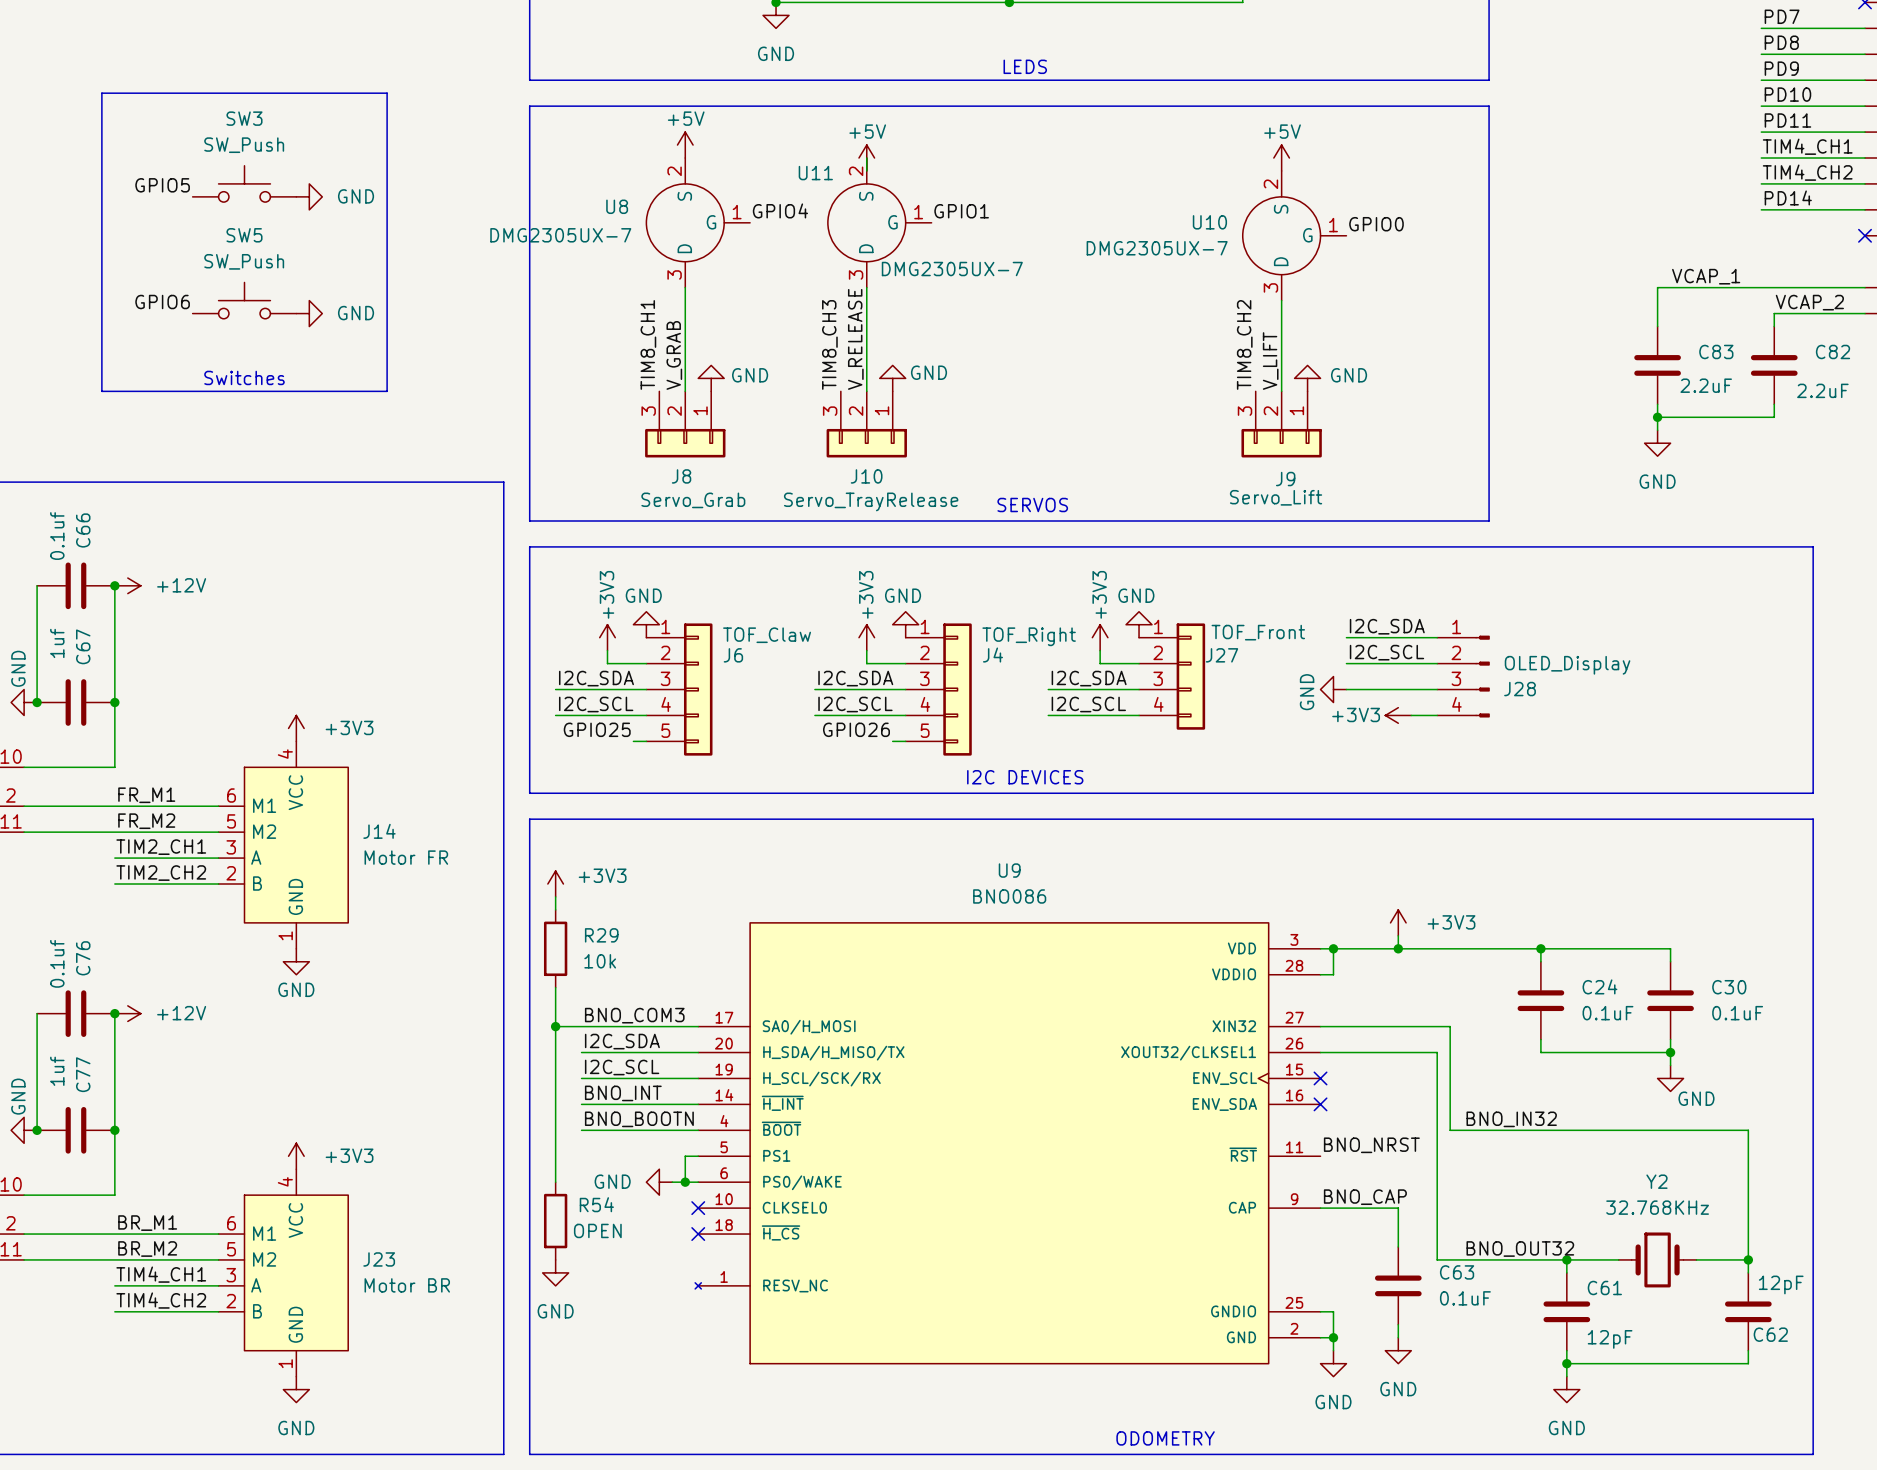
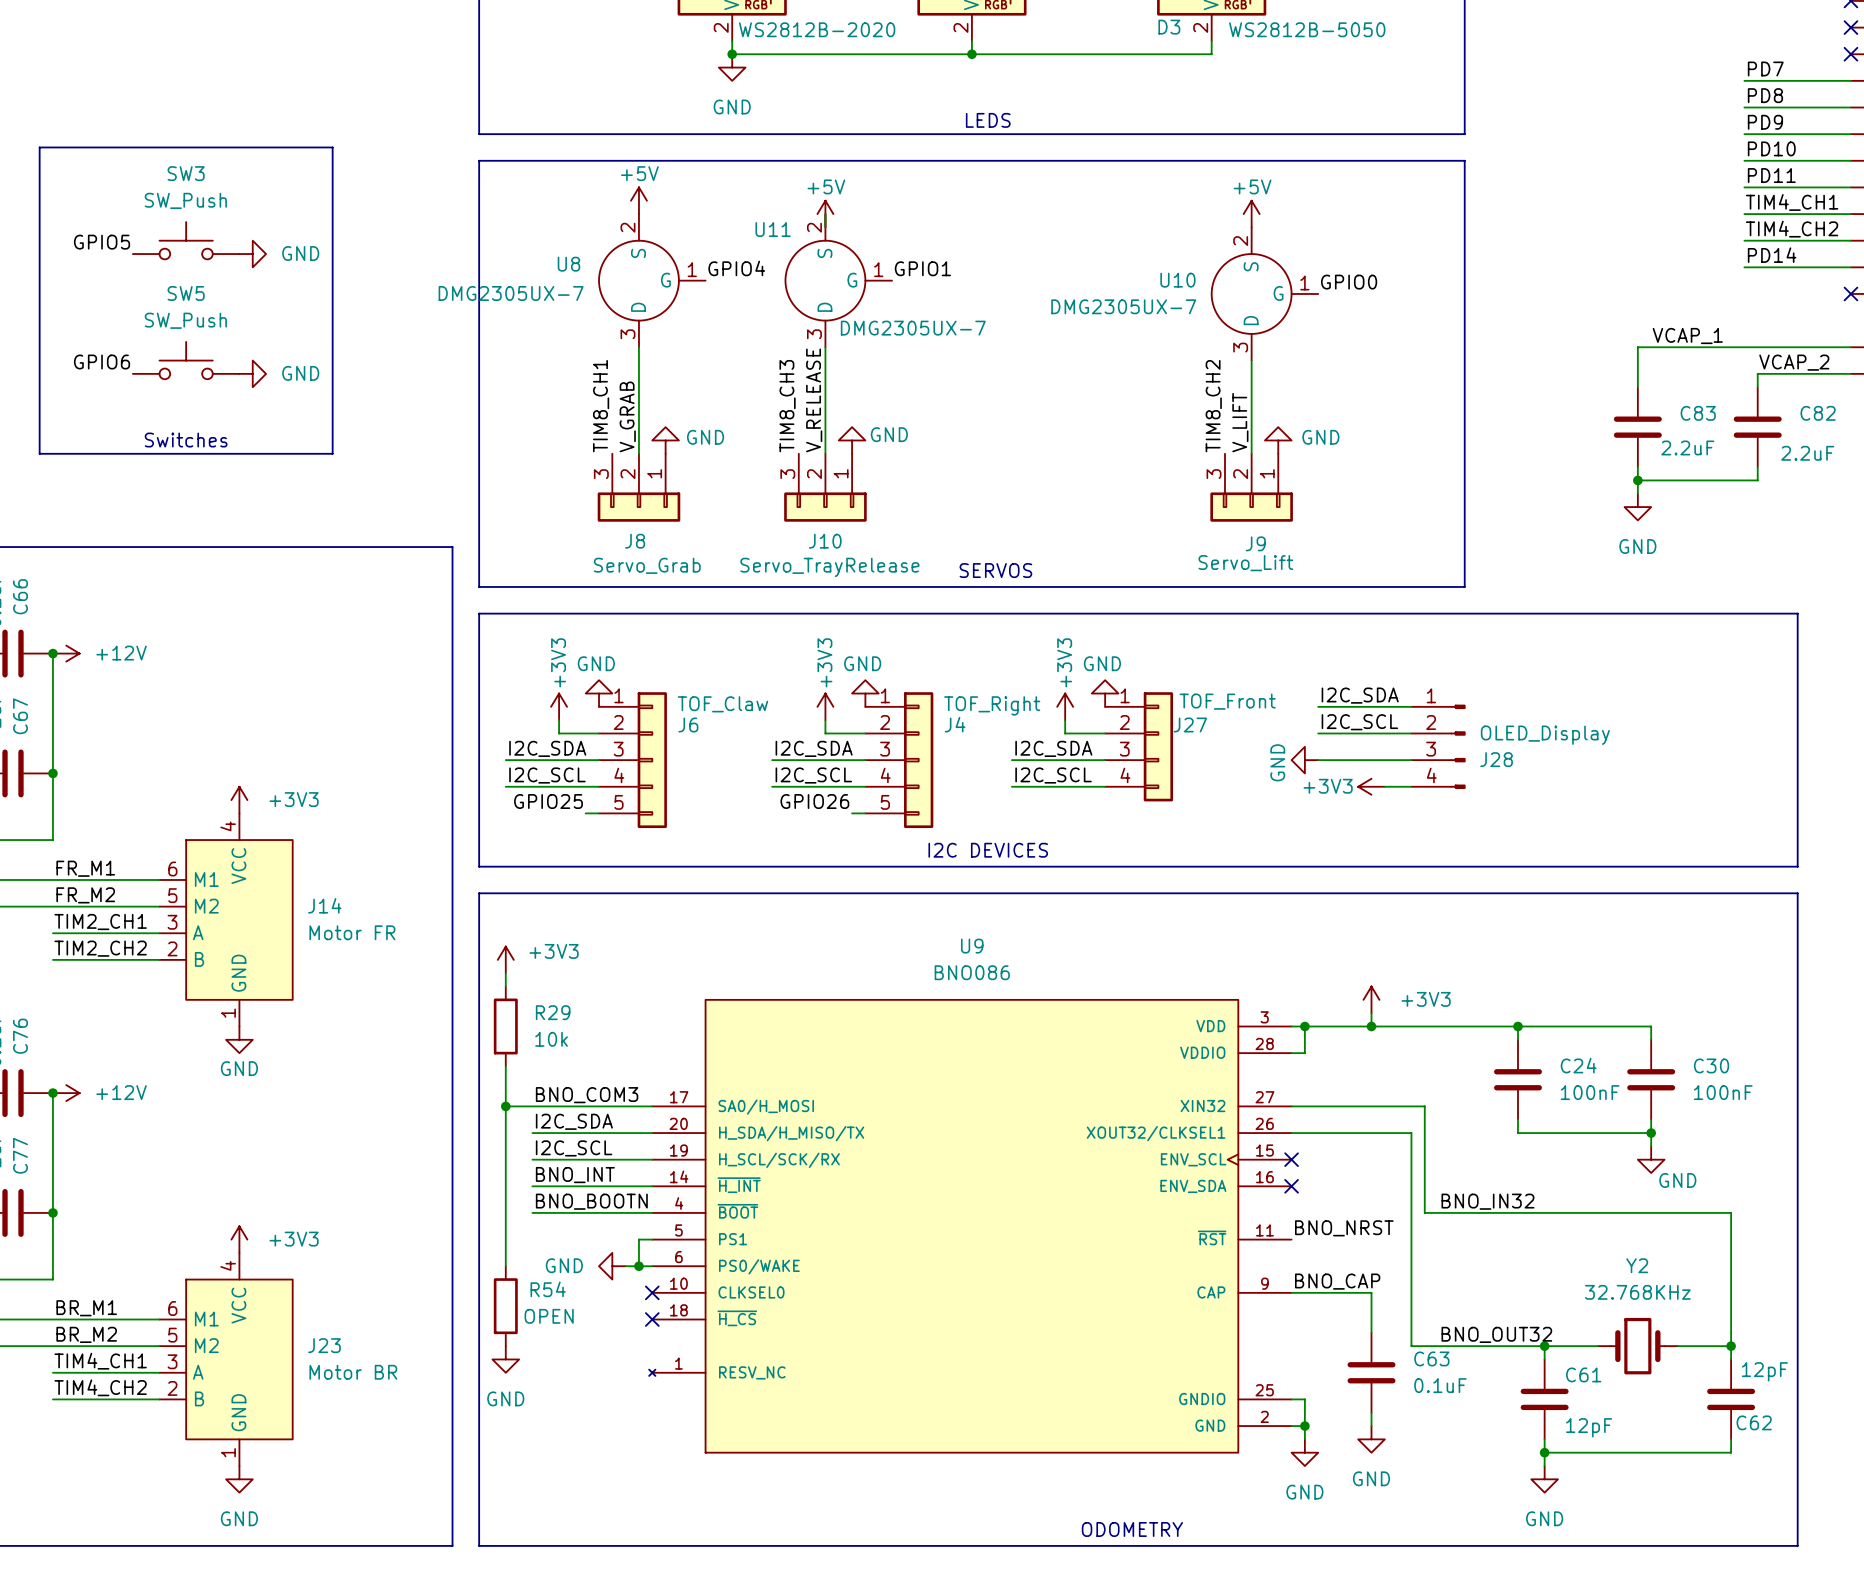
C24 value: 0.1uF (1607, 1013) -> 100nF (1590, 1092)
C30 value: 0.1uF (1737, 1013) -> 100nF (1723, 1092)

